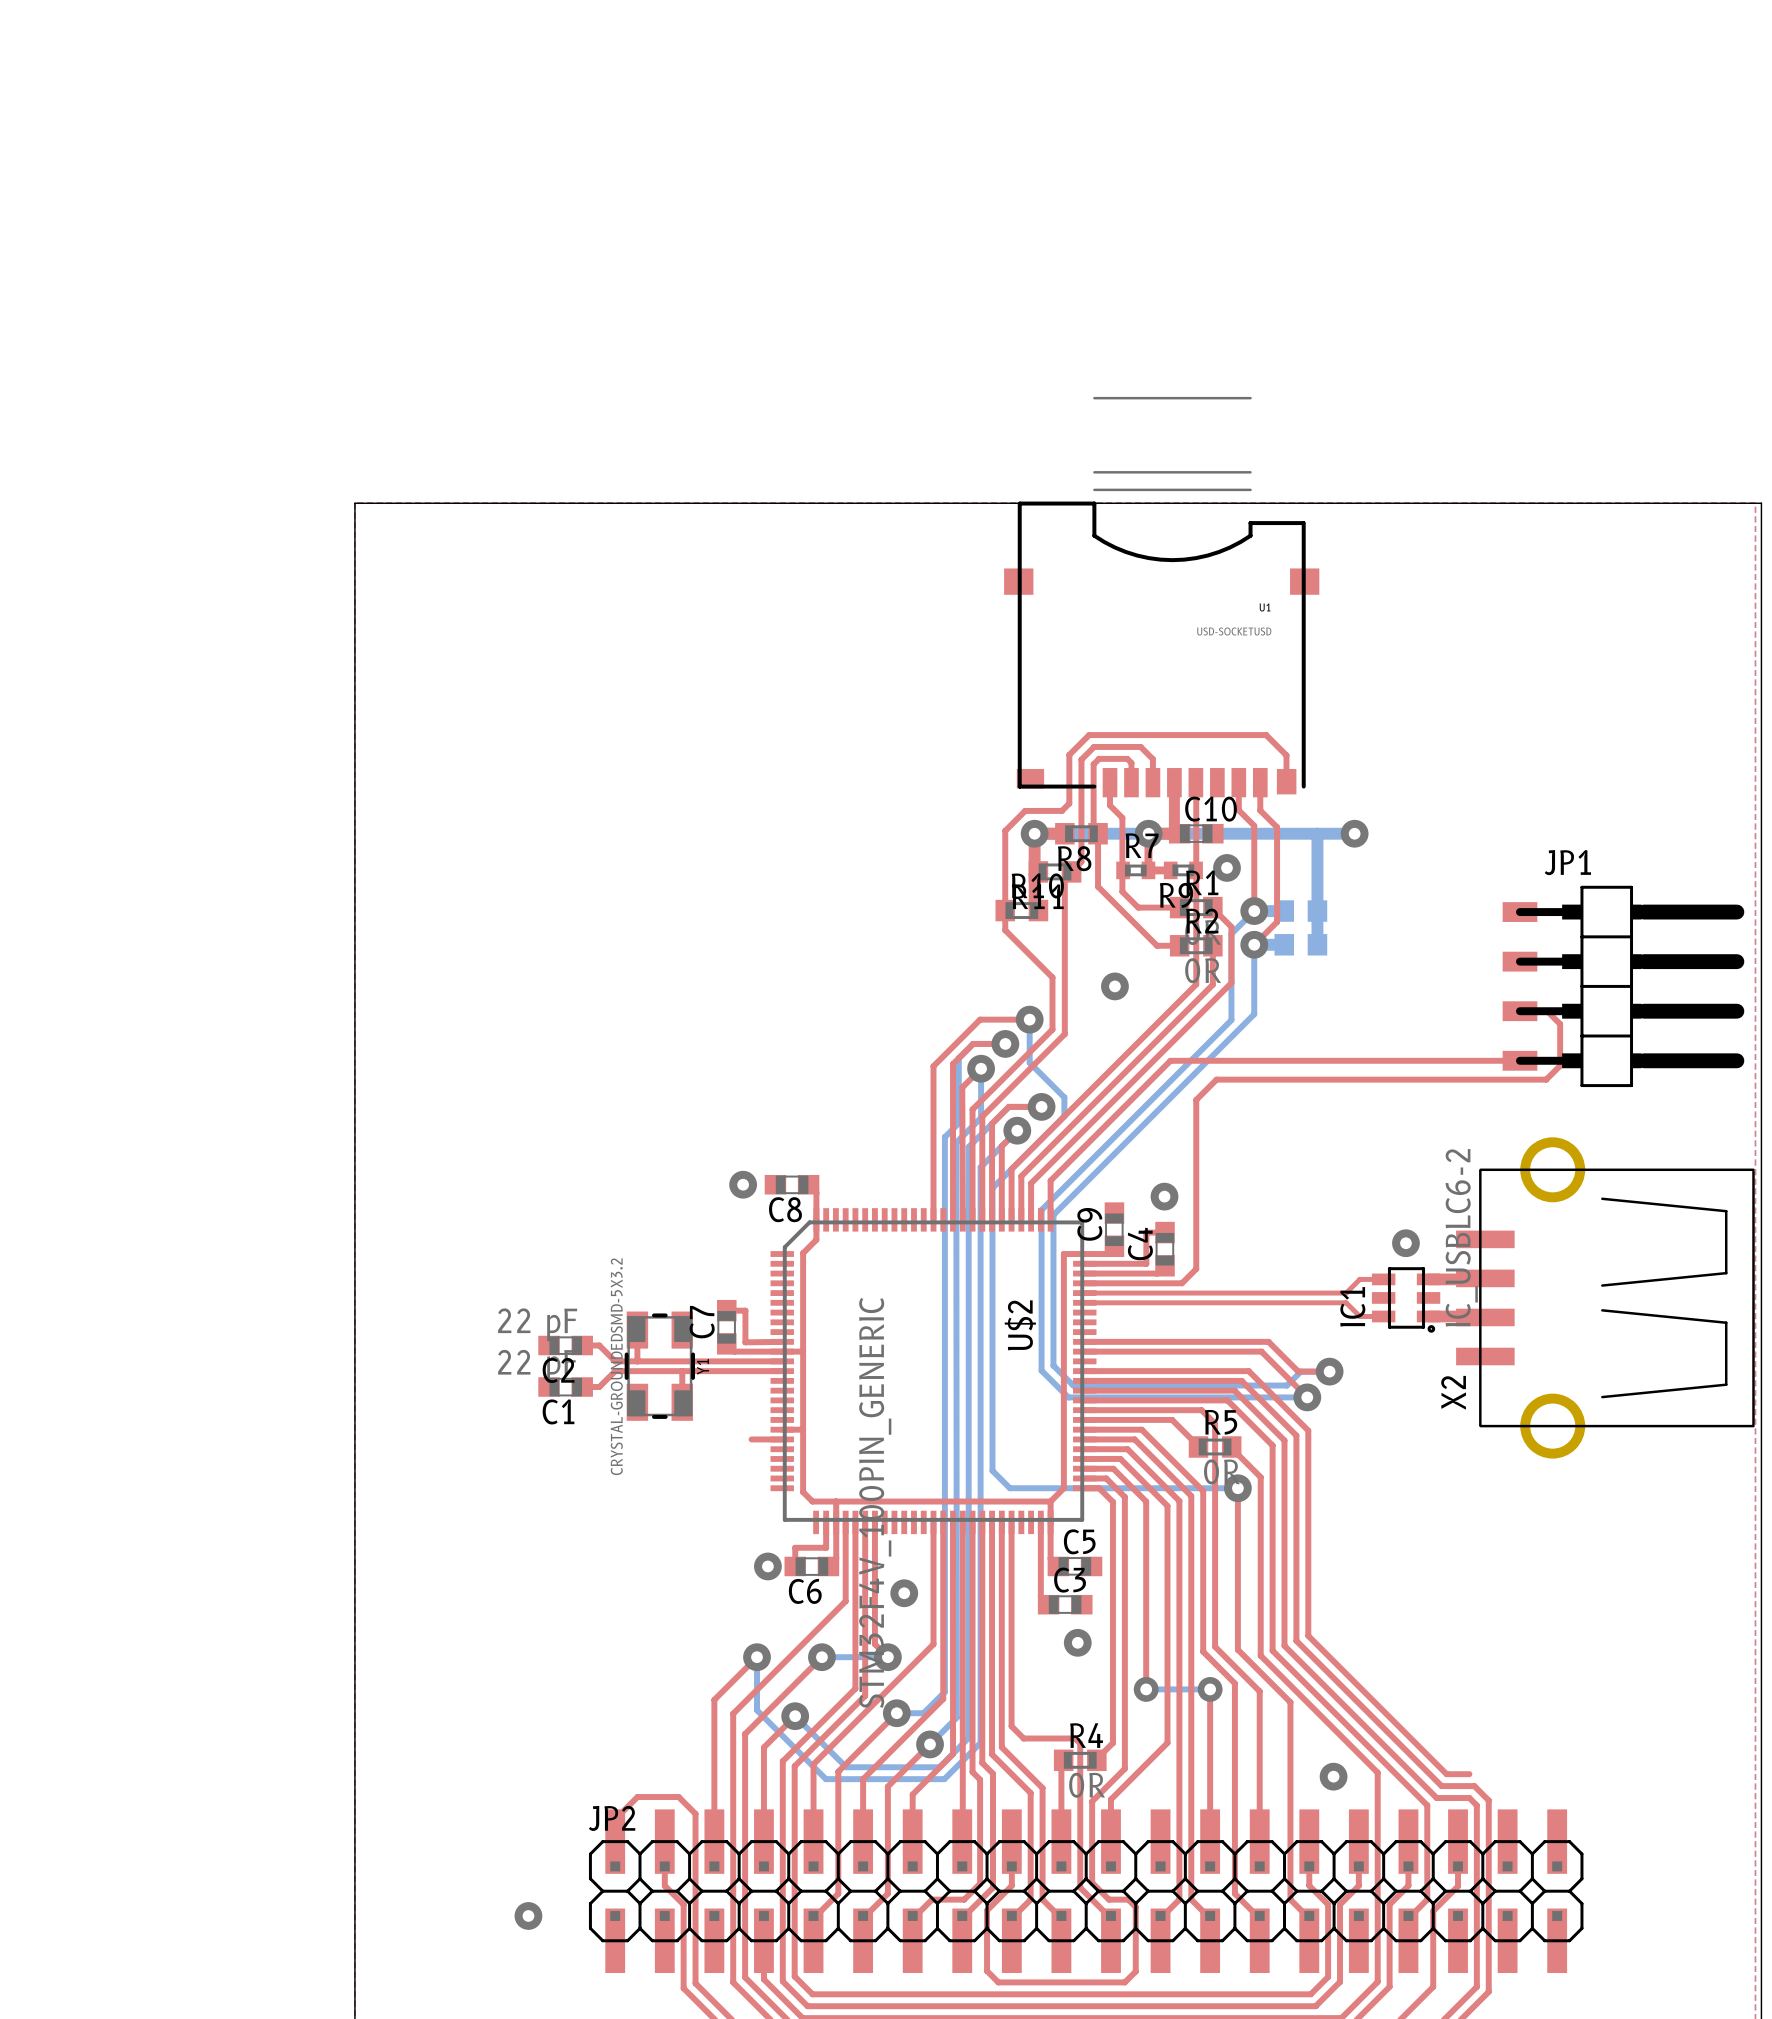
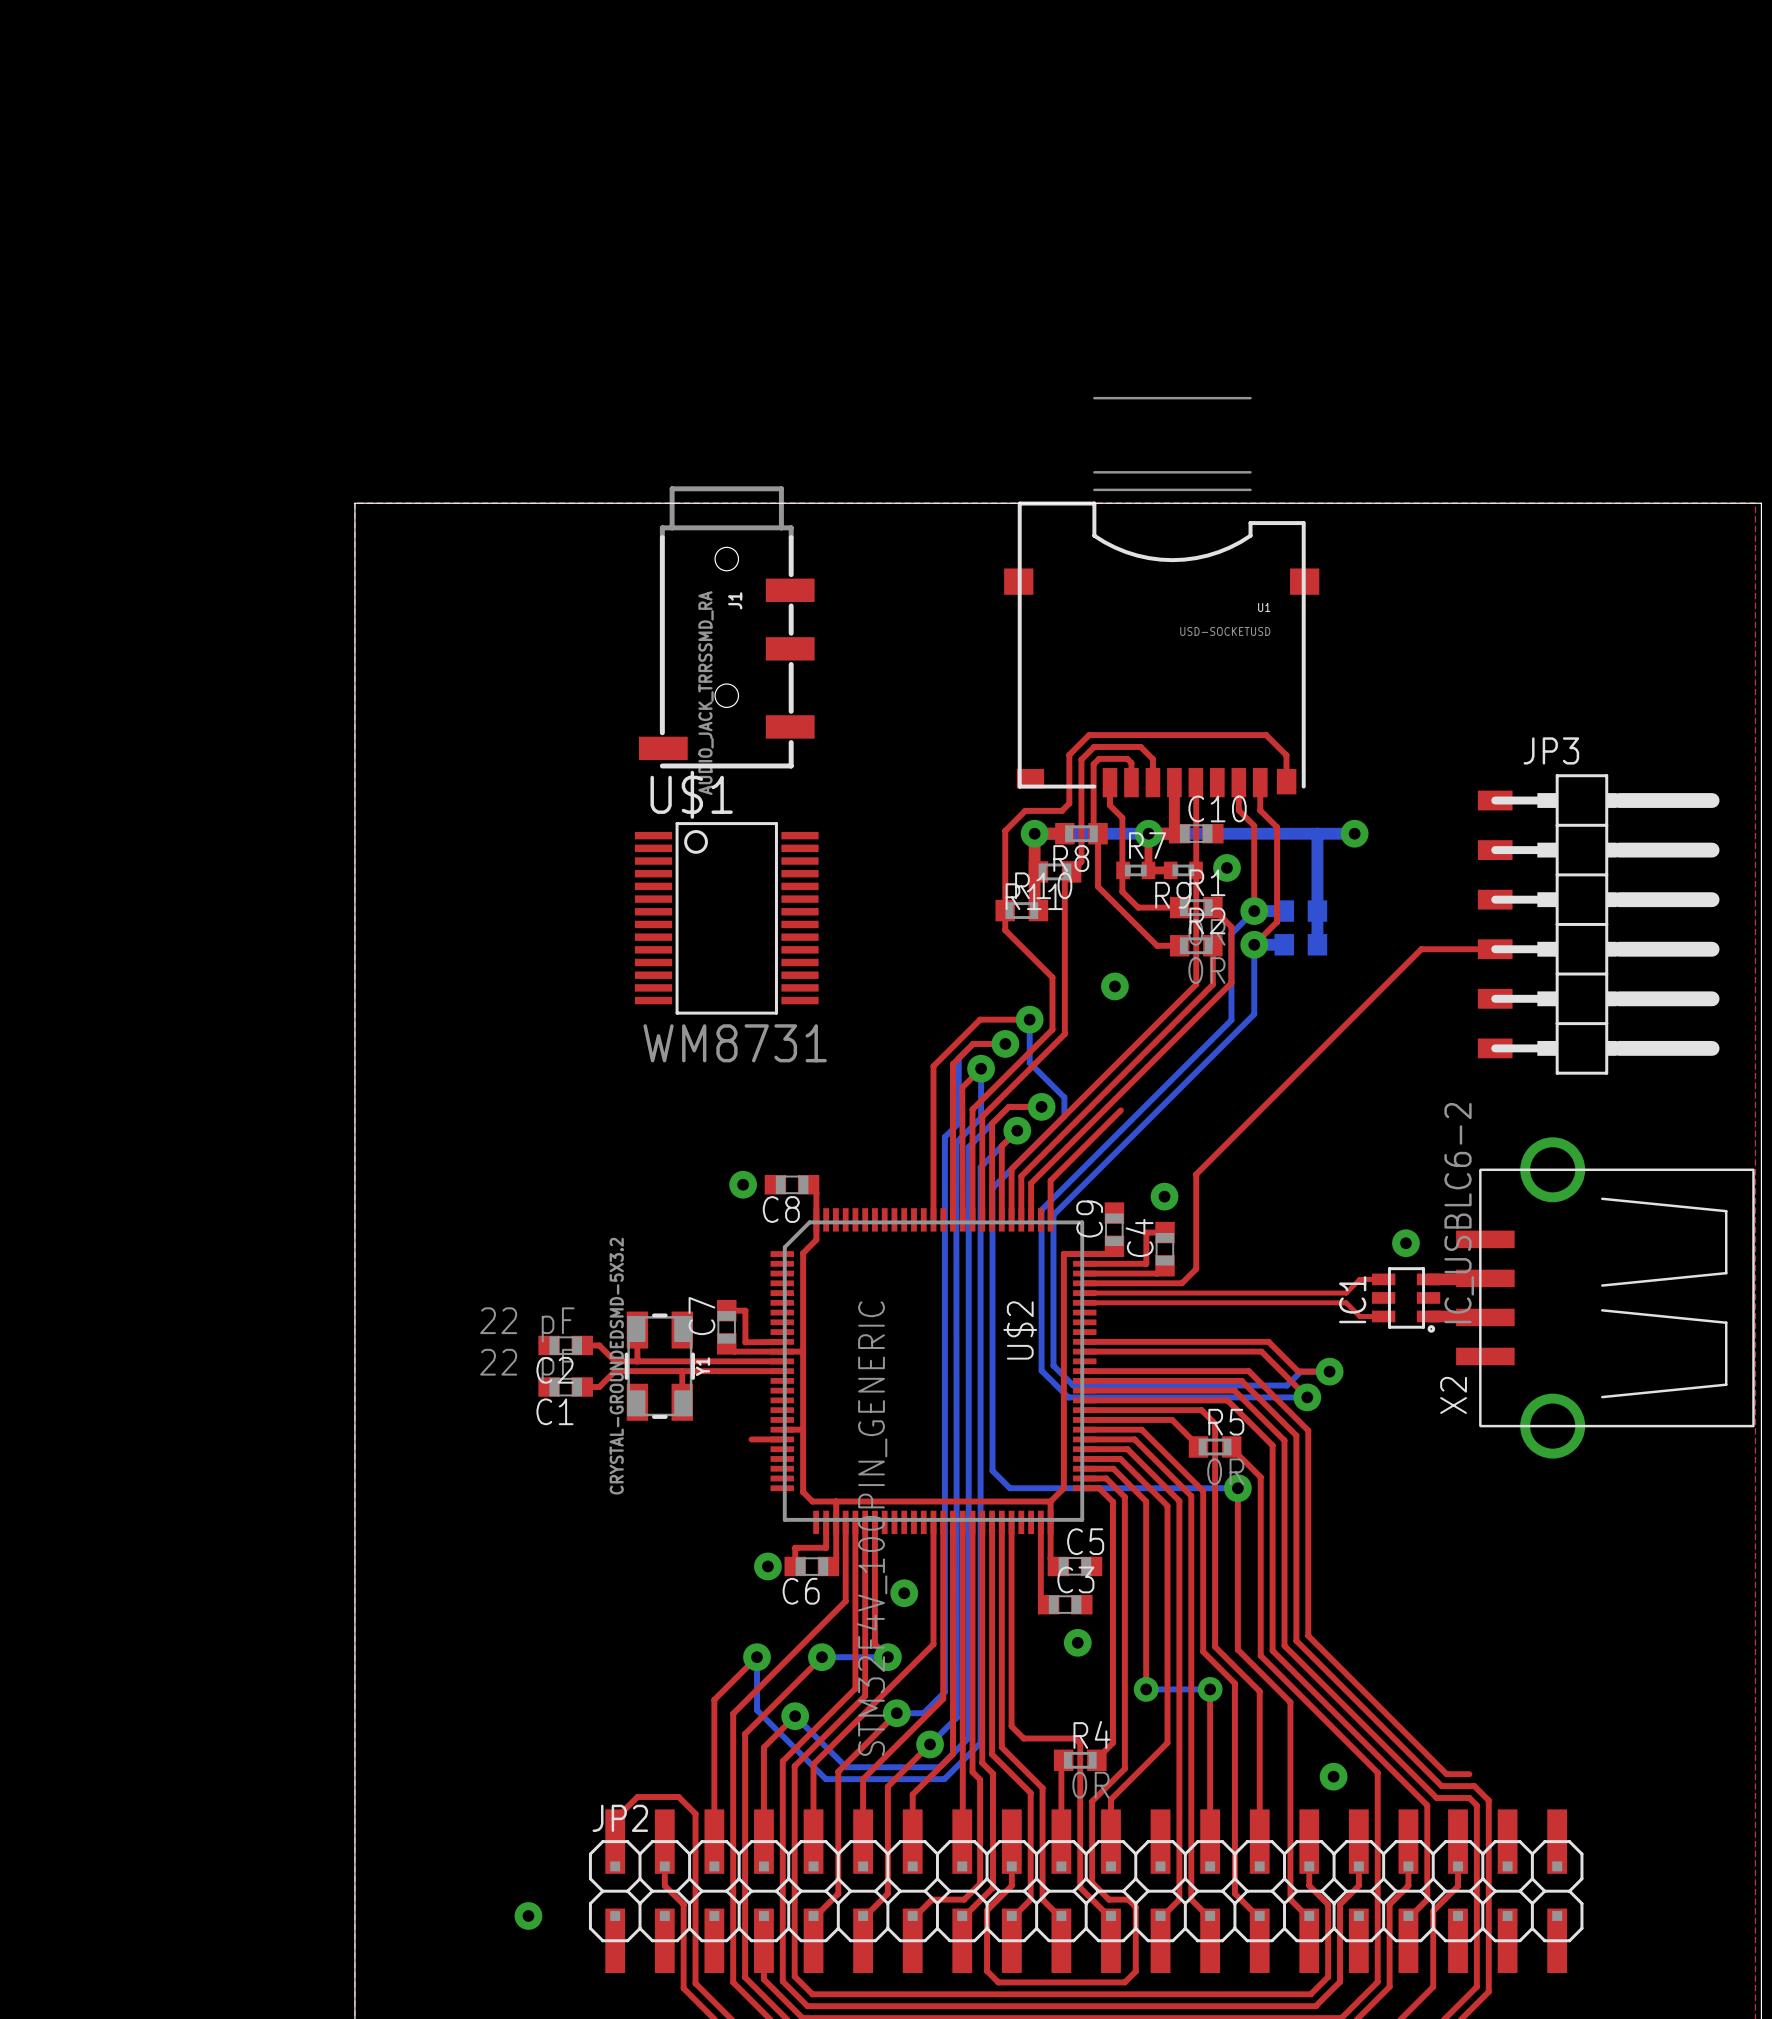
J1: none -> AUDIO_JACK_TRRSSMD_RA (726, 627)
U$1: none -> WM8731 (726, 918)
JP3: none -> (1598, 924)
JP1: (1623, 986) -> none
top track: (1519, 1011) (1547, 1011) (1560, 1024) (1560, 1065) (1546, 1079) (1216, 1079) (1196, 1099) (1196, 1174) -> (1495, 949) (1421, 949) (1196, 1174)
top track: (1519, 1060) (1170, 1060) (1120, 1110) -> none

